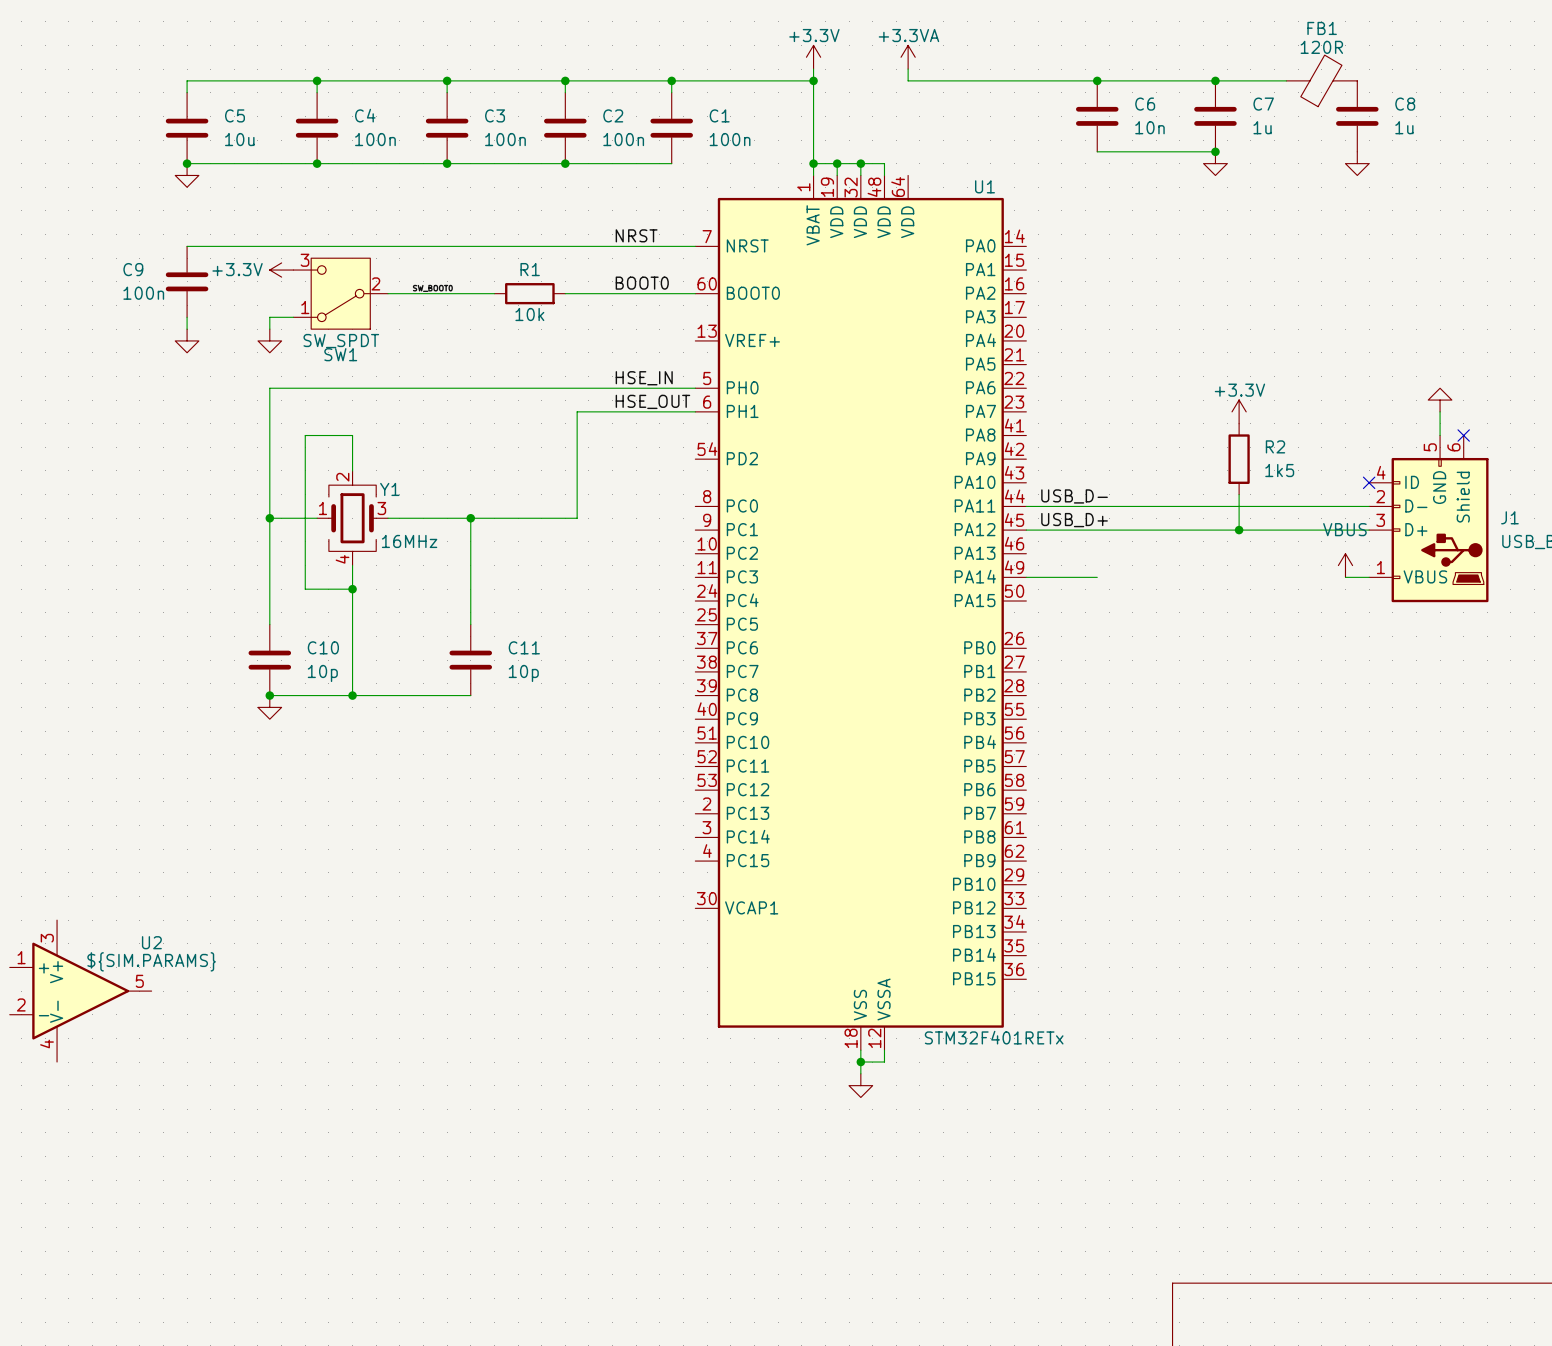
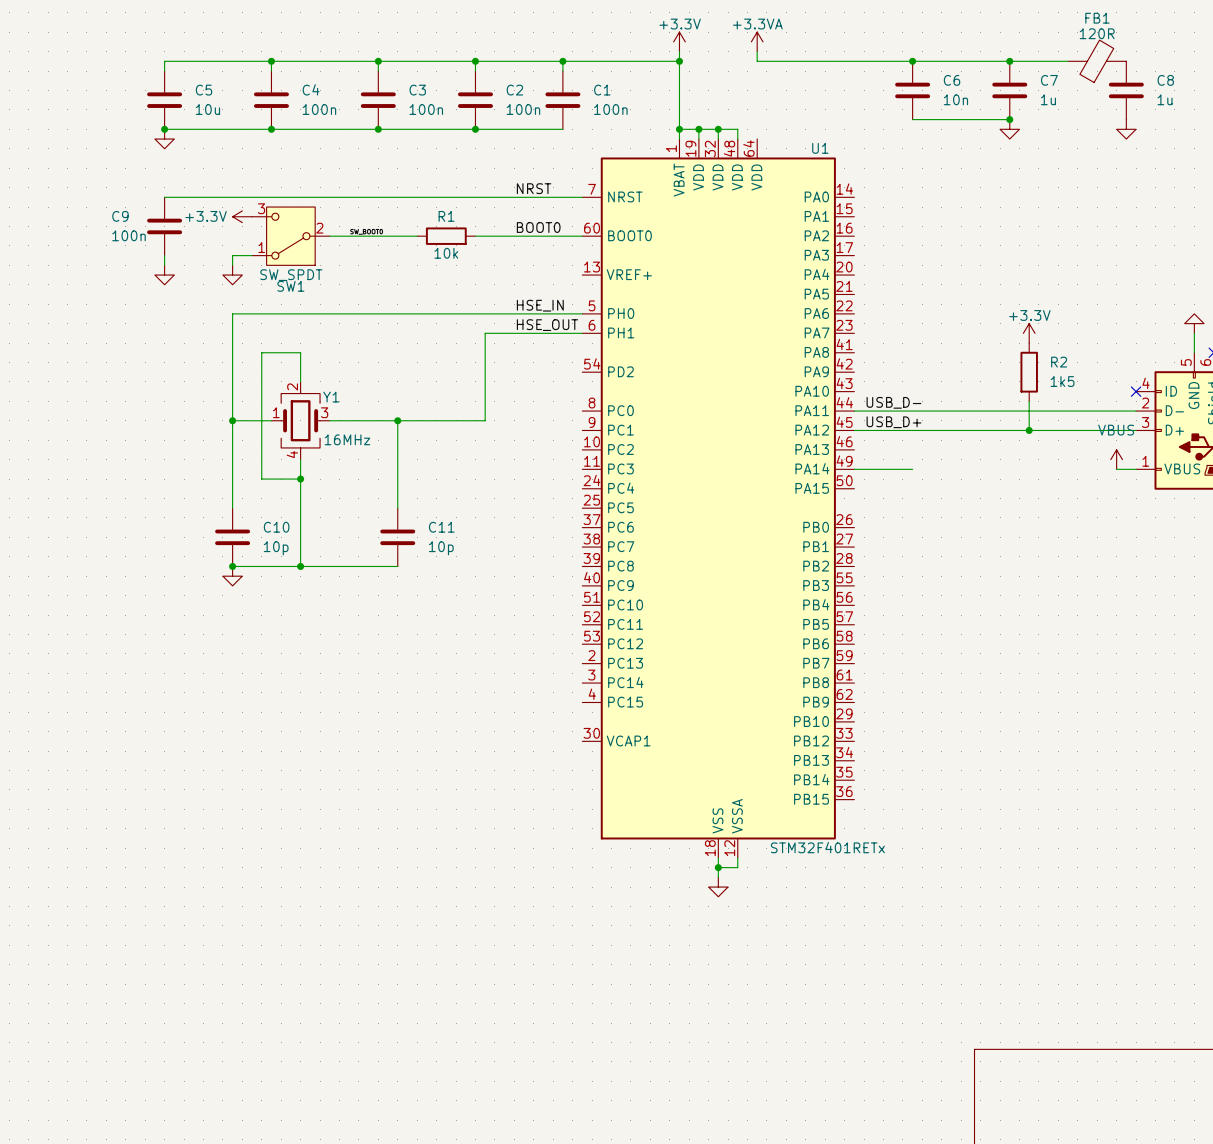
U2: ${SIM.PARAMS} (80, 991) -> none

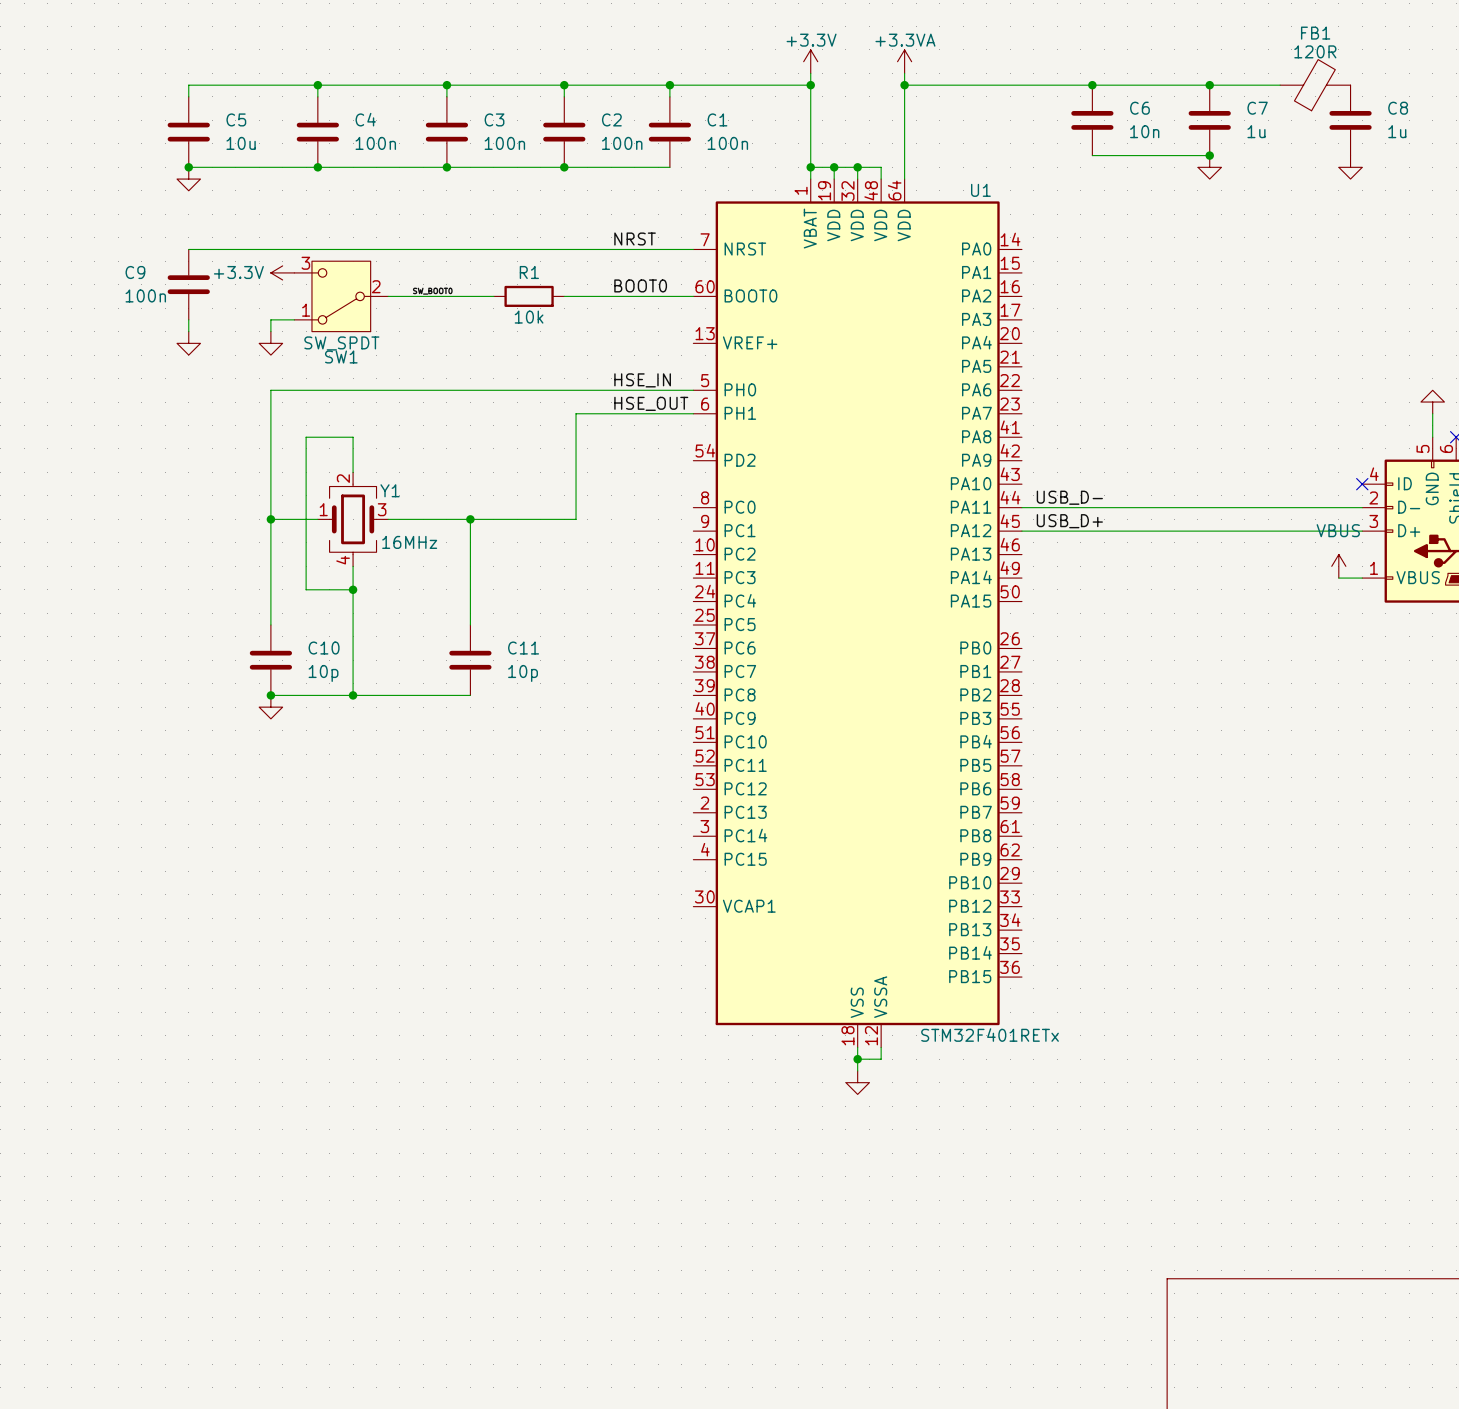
wire: none -> (904, 85) (904, 179)
junction: none -> (904, 85)
power symbol: +3.3V (1029, 333) -> none
R2: 1k5 (1029, 372) -> none
wire: (1029, 401) (1029, 430) -> none
junction: (1029, 430) -> none
wire: (854, 469) (912, 469) -> none

